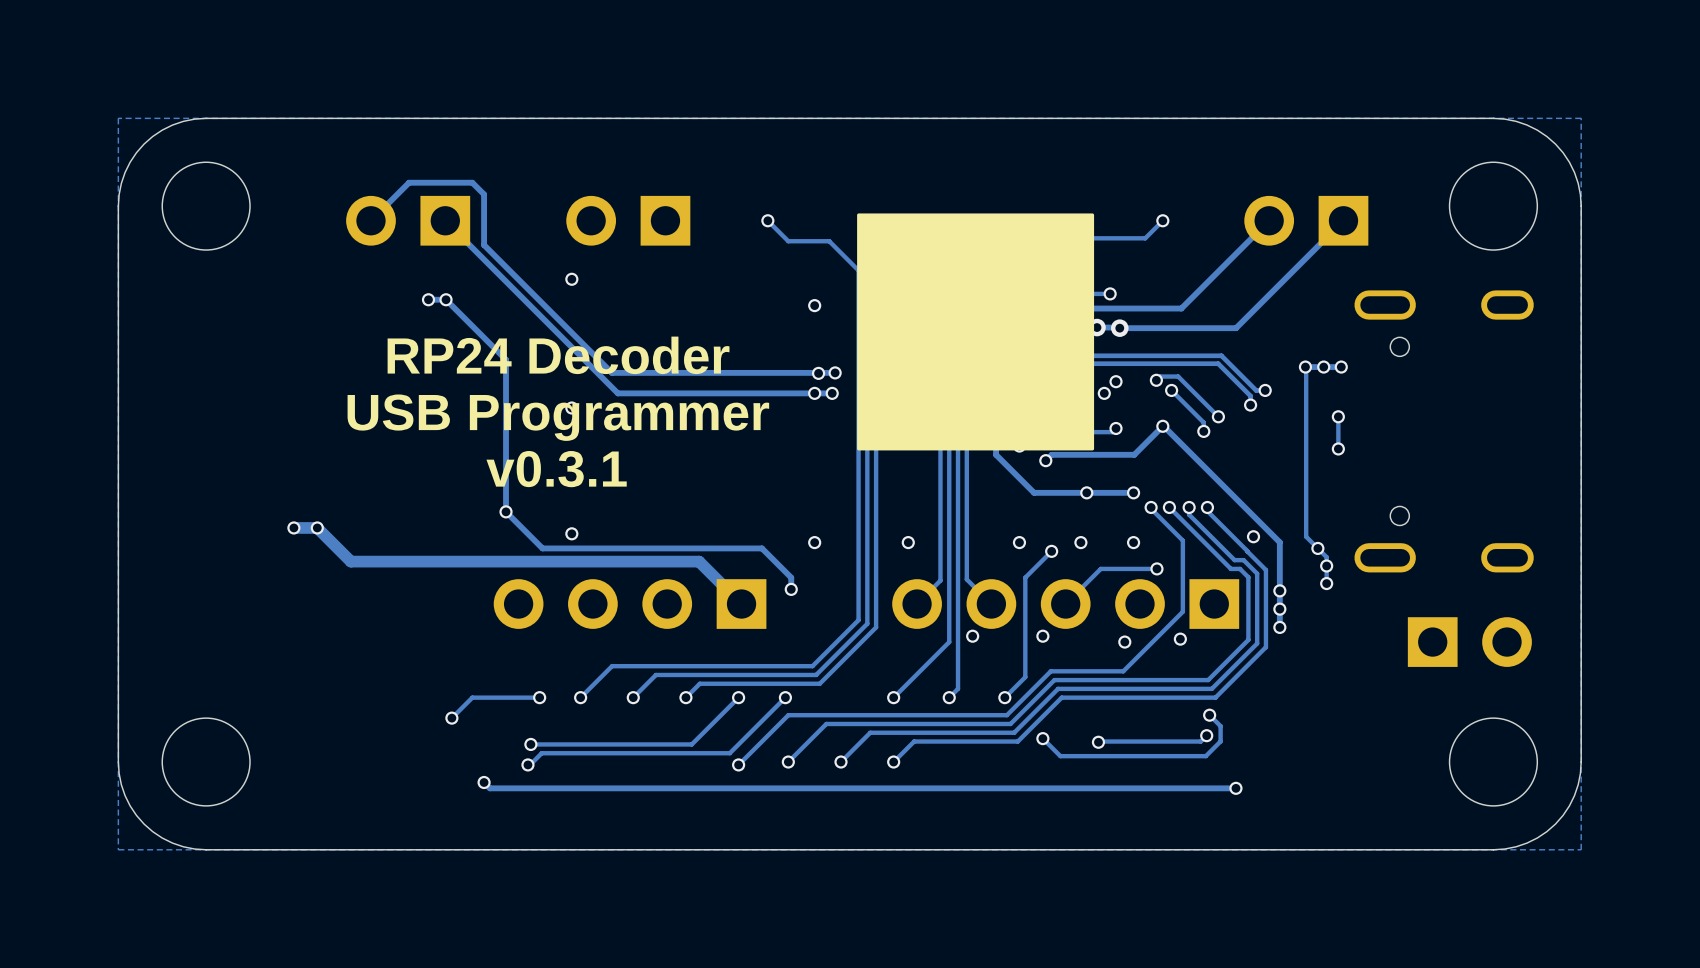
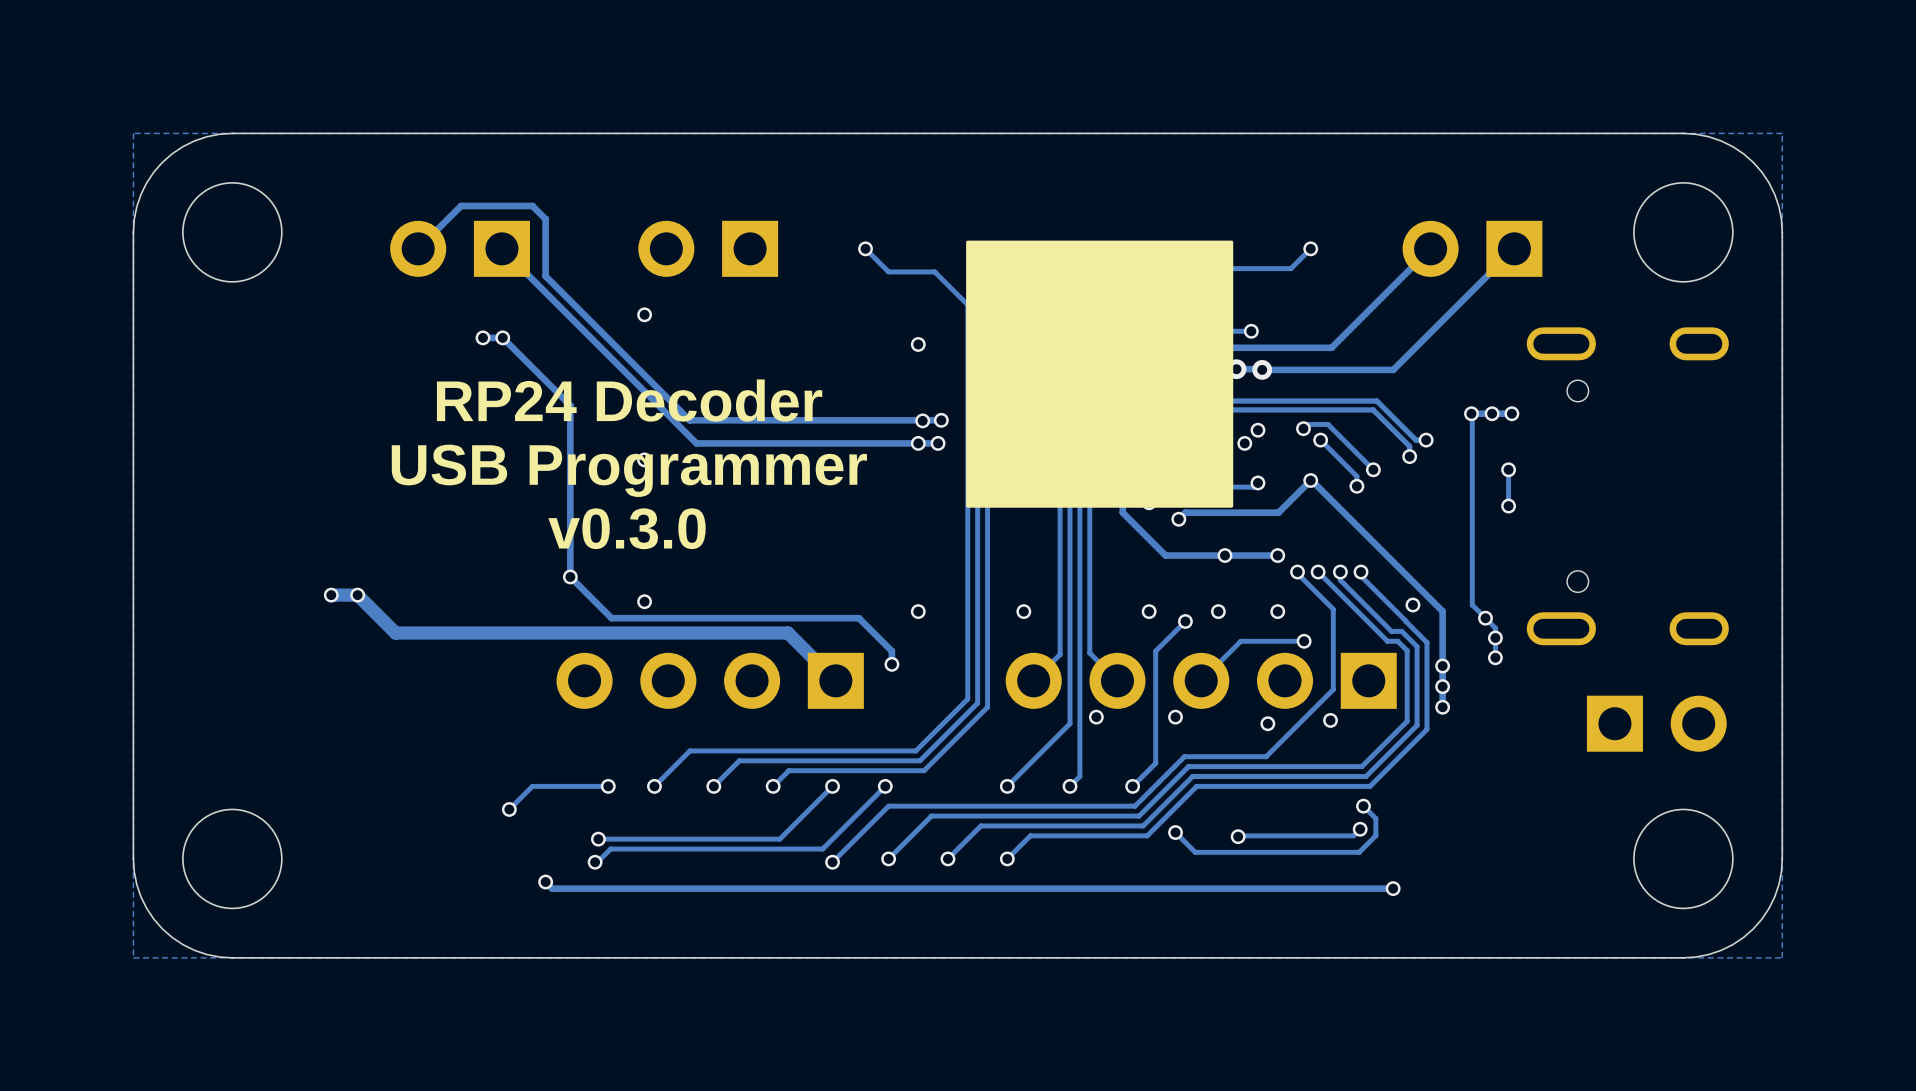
text: v0.3.1 (556, 469) -> v0.3.0 (627, 528)

